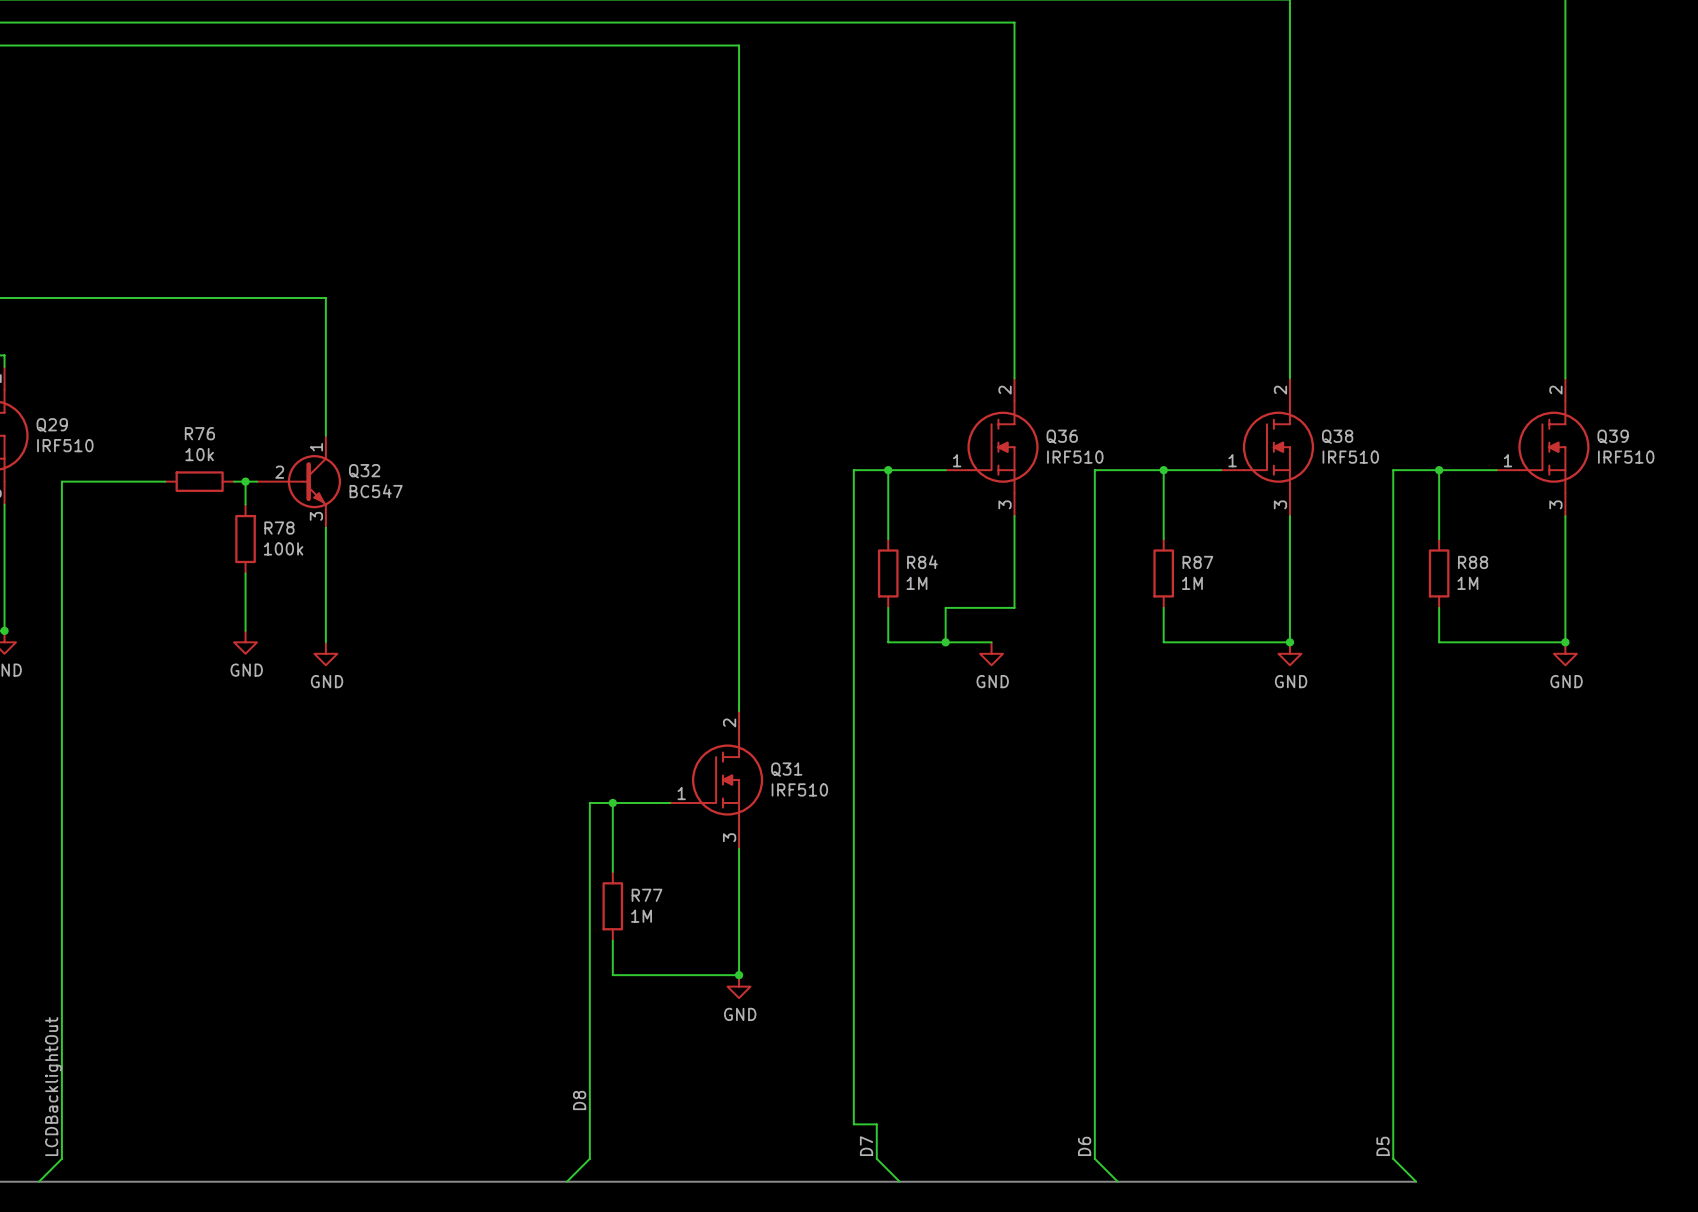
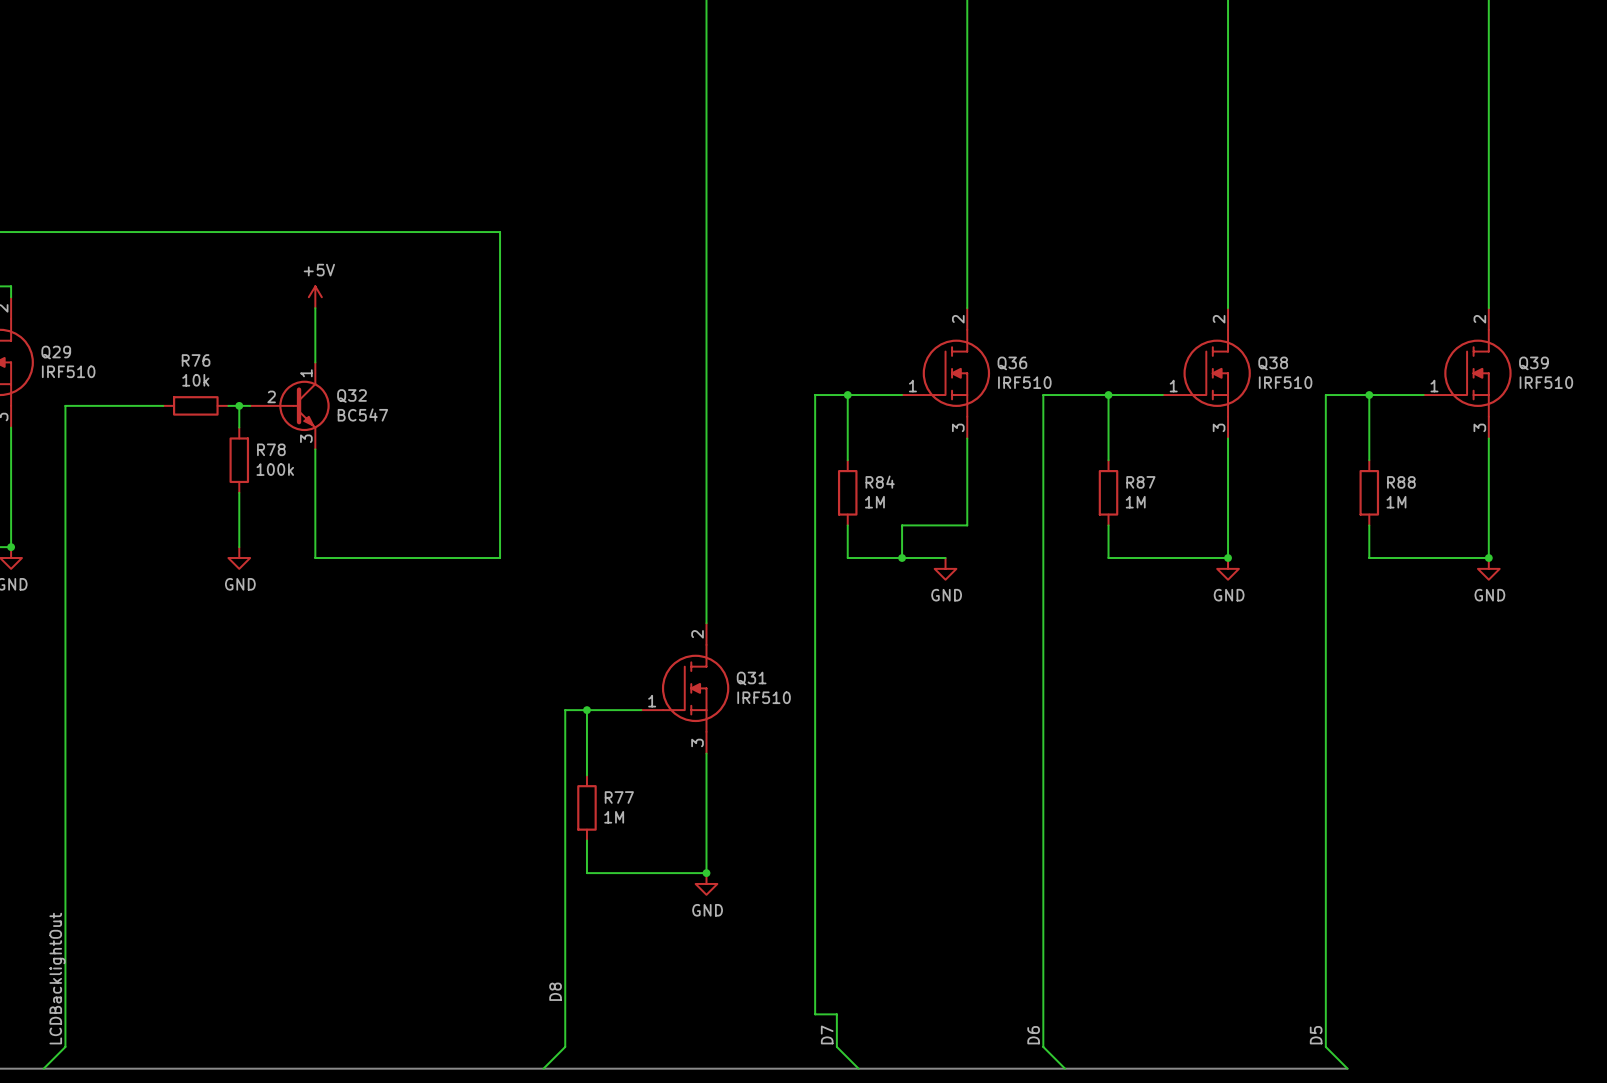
wire: (325, 298) (325, 378) -> (315, 232) (500, 232) (500, 558) (315, 558)
power symbol: none -> +5V (315, 297)
power symbol: GND (325, 653) -> none

